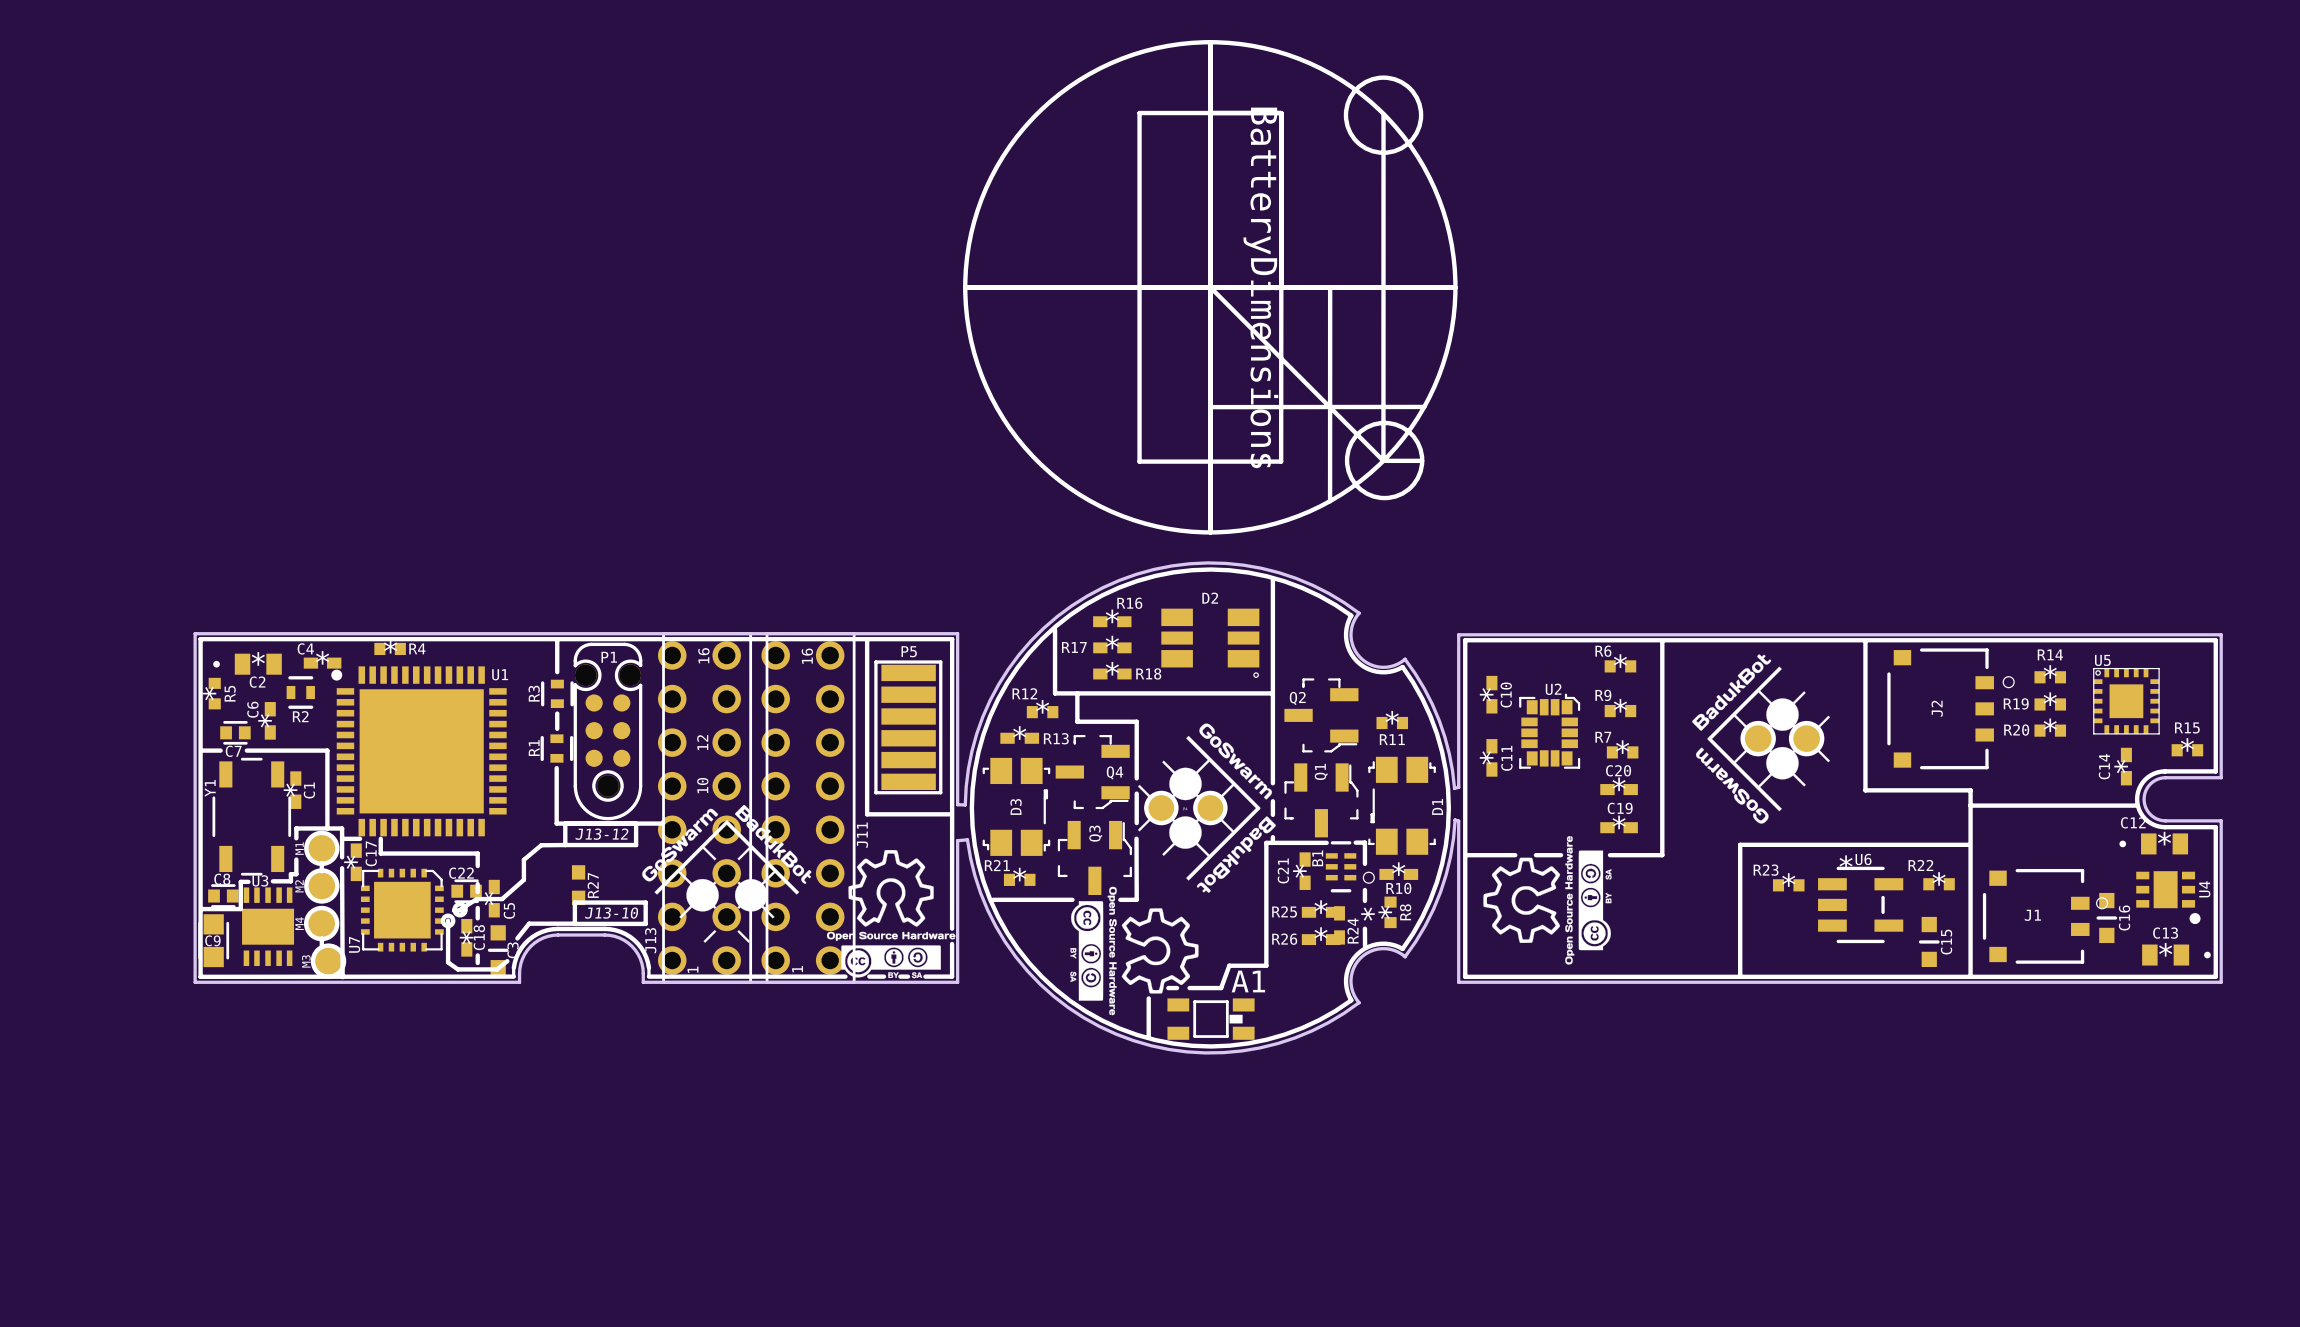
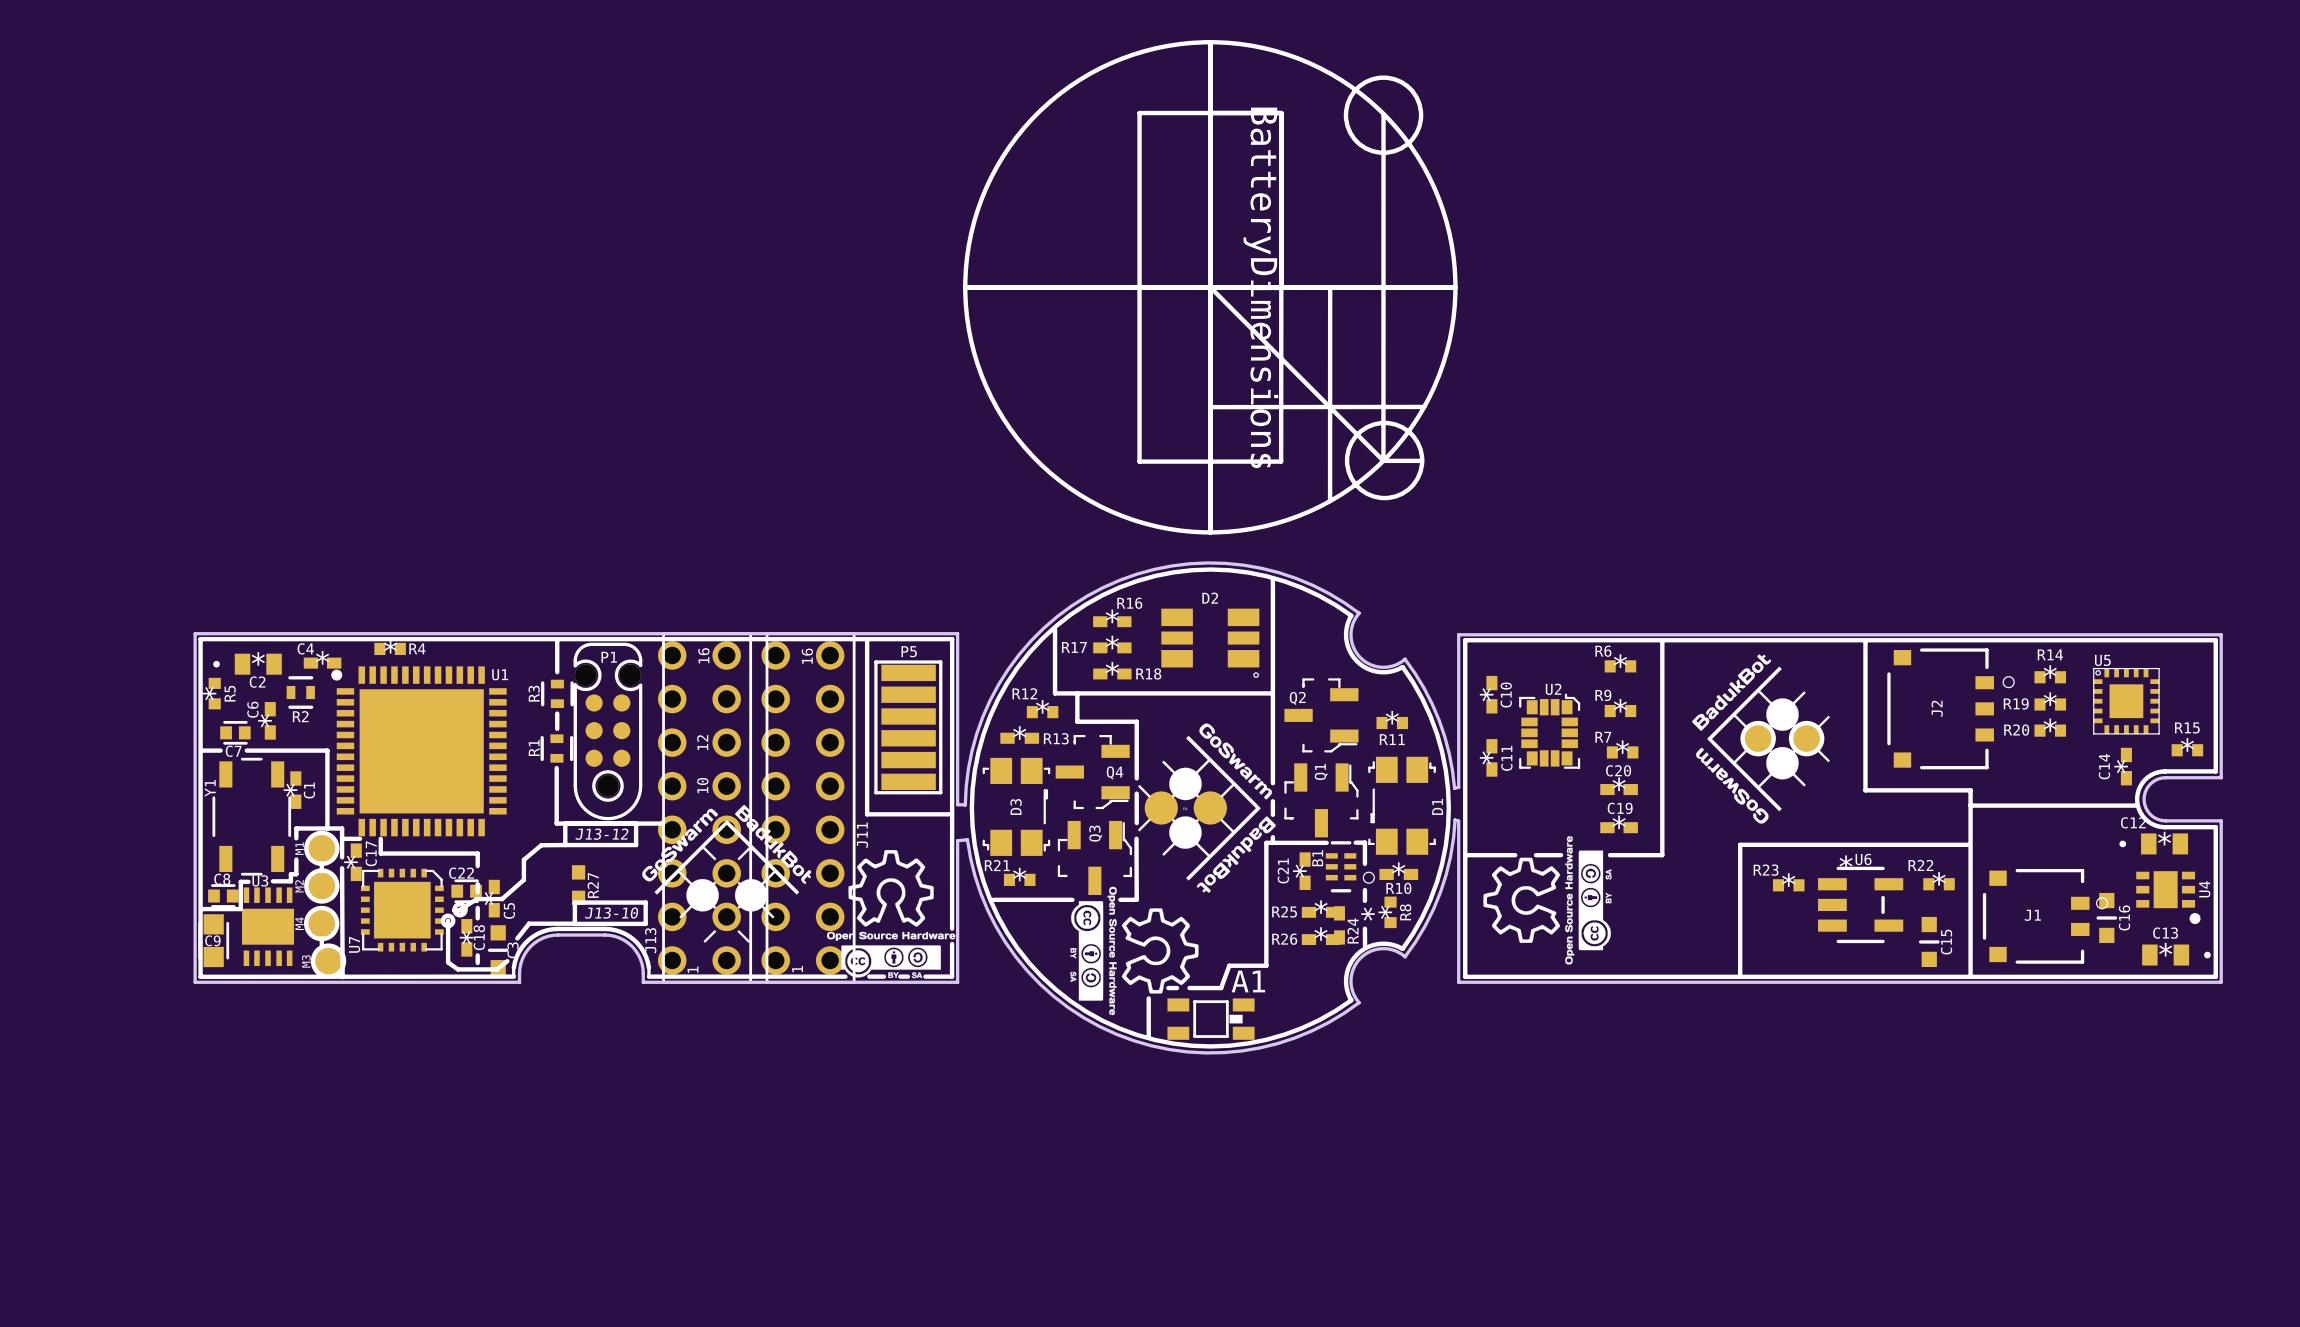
drawing: [1144, 790, 1228, 826] -> none

